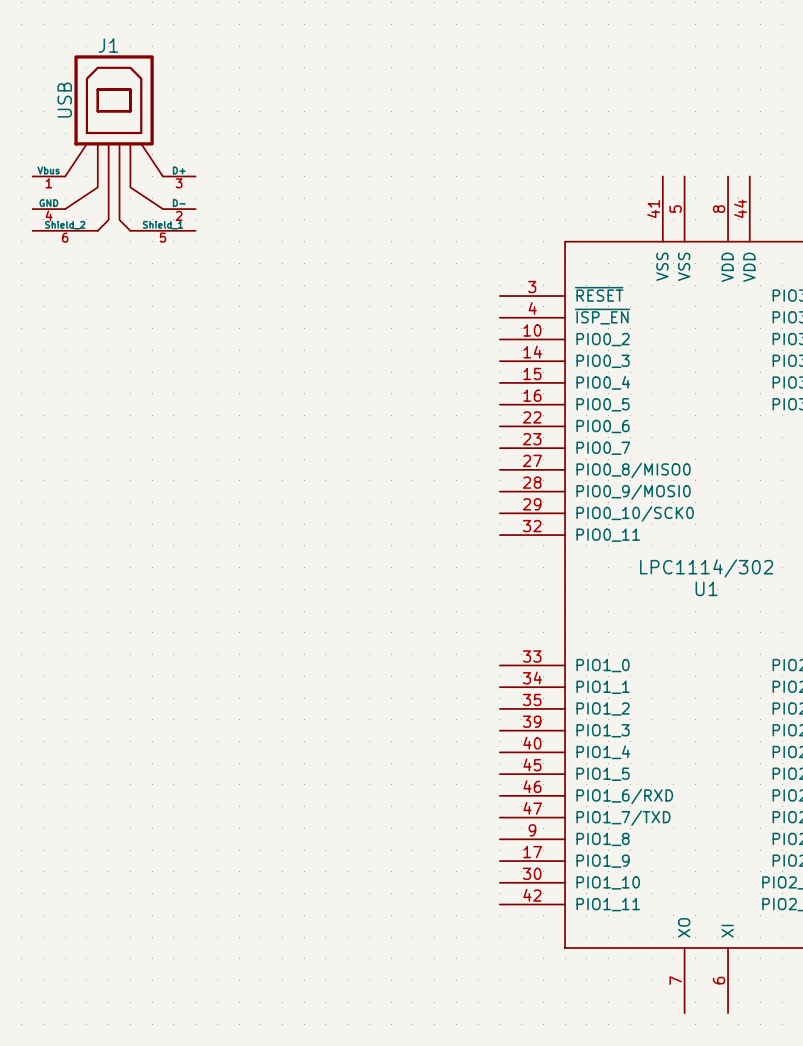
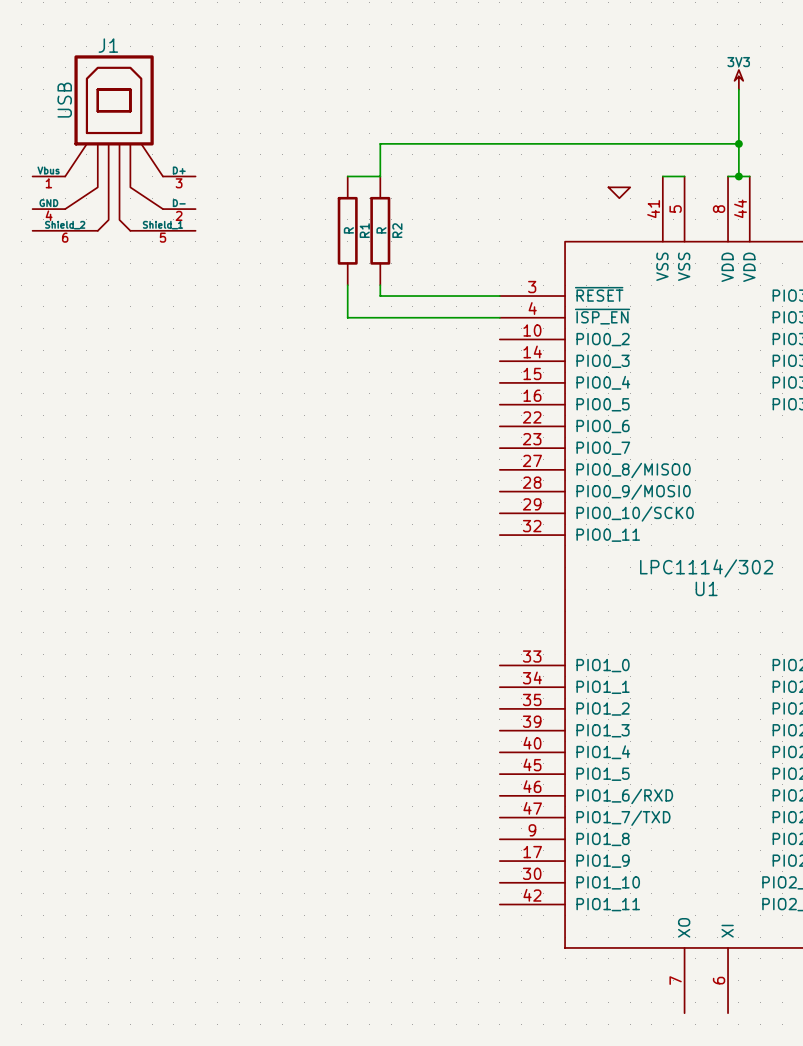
power symbol: none -> 3V3 (738, 79)
wire: none -> (738, 89) (738, 176)
wire: none -> (738, 143) (380, 143) (380, 176) (347, 176)
junction: none -> (738, 143)
wire: none -> (662, 176) (684, 176)
wire: none -> (728, 176) (749, 176)
junction: none -> (738, 176)
power symbol: none -> (619, 192)
R1: none -> R (347, 230)
R2: none -> R (380, 230)
wire: none -> (347, 285) (347, 317) (499, 317)
wire: none -> (380, 285) (380, 296) (499, 296)

